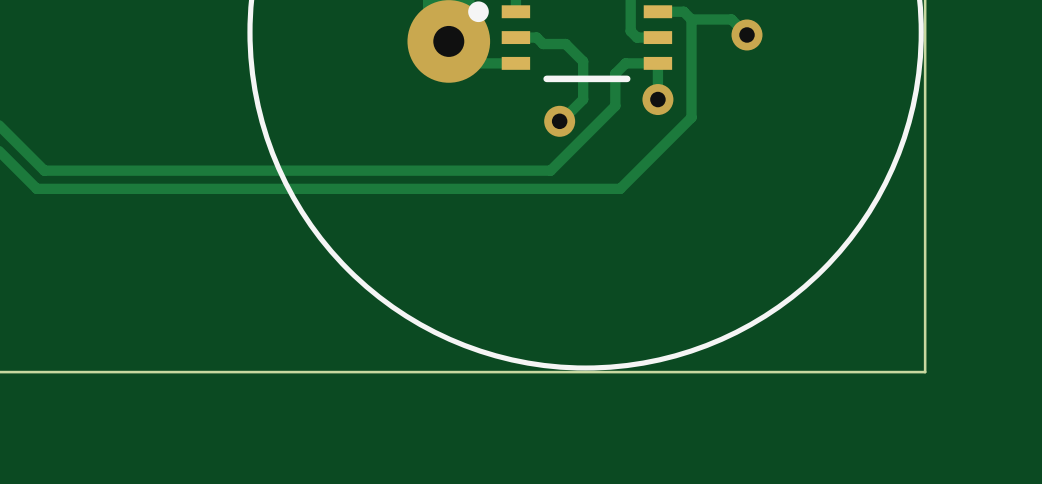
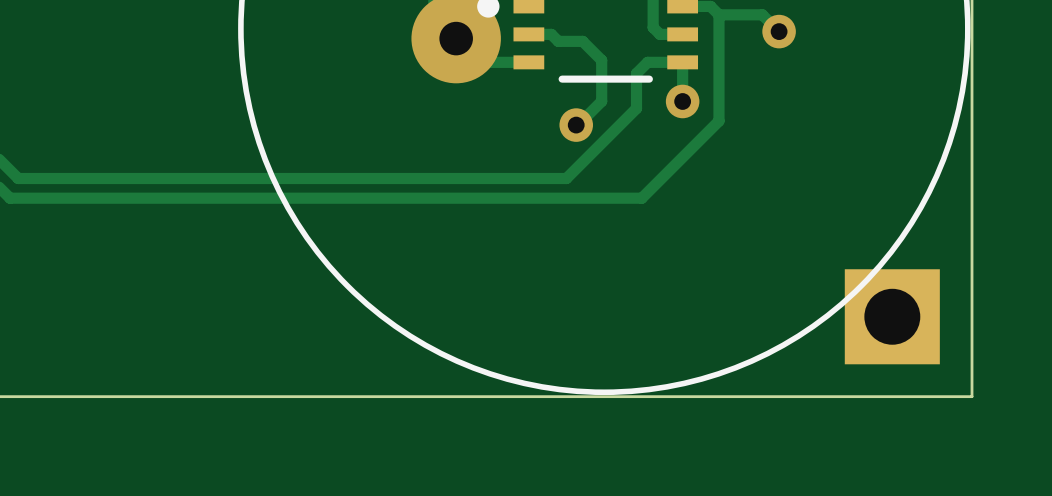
part: none -> (892, 316)

